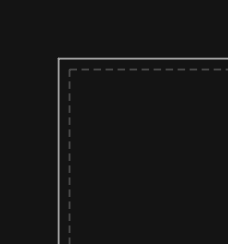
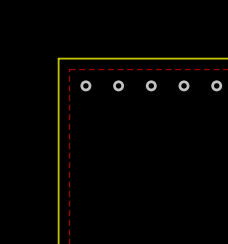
via: none -> (85, 85)
via: none -> (118, 85)
via: none -> (151, 85)
via: none -> (183, 85)
via: none -> (216, 85)

